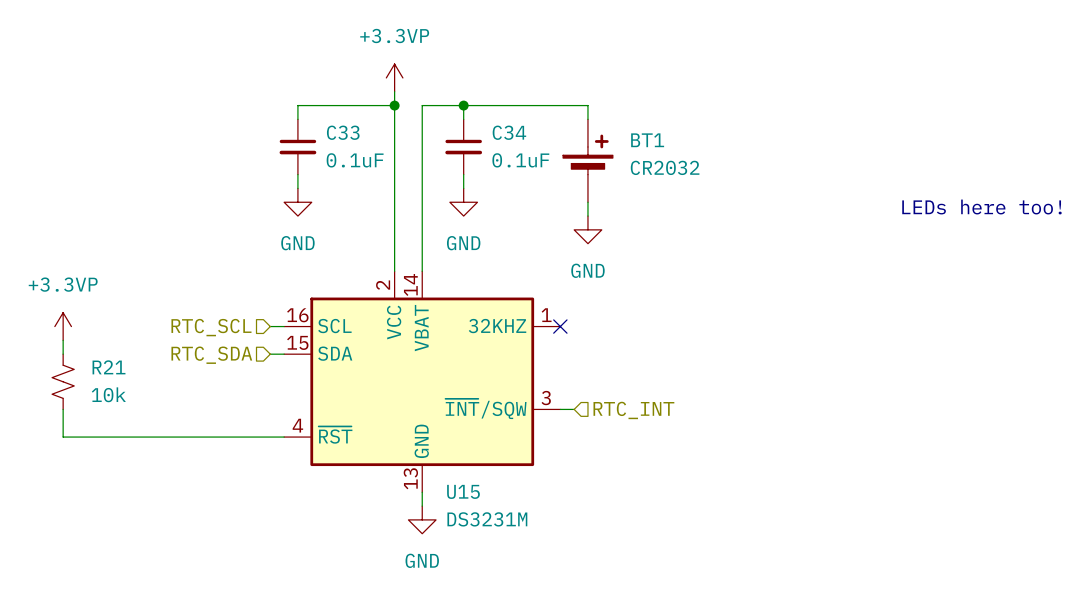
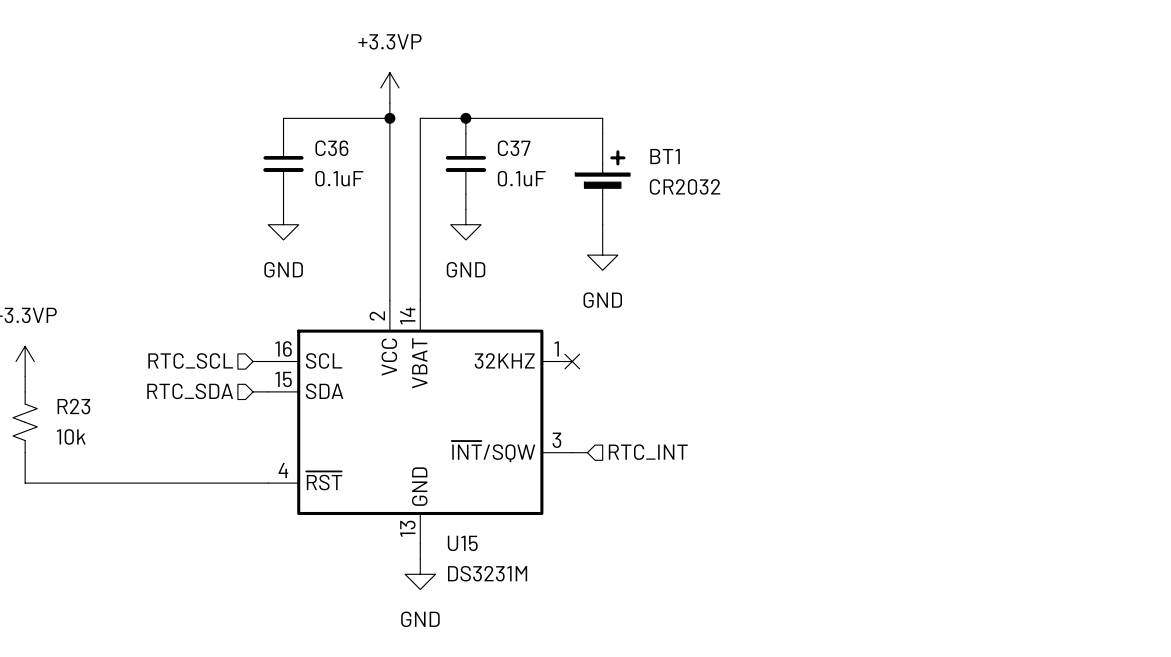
C33 name: C33 (343, 132) -> C36 (331, 148)
C34 name: C34 (509, 132) -> C37 (514, 148)
text: LEDs here too! (981, 207) -> none
R21 name: R21 (109, 367) -> R23 (73, 406)

